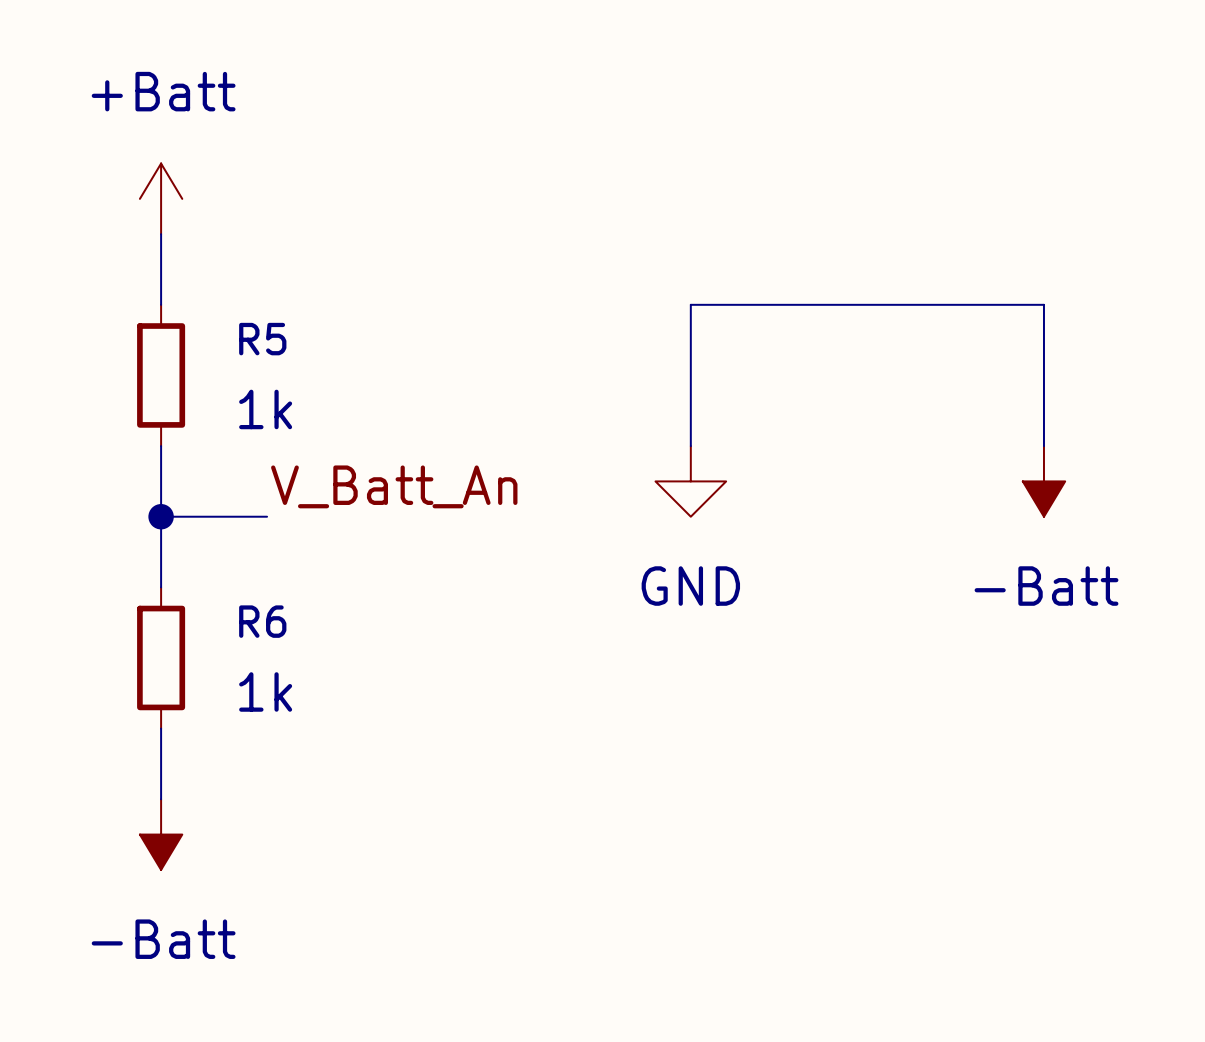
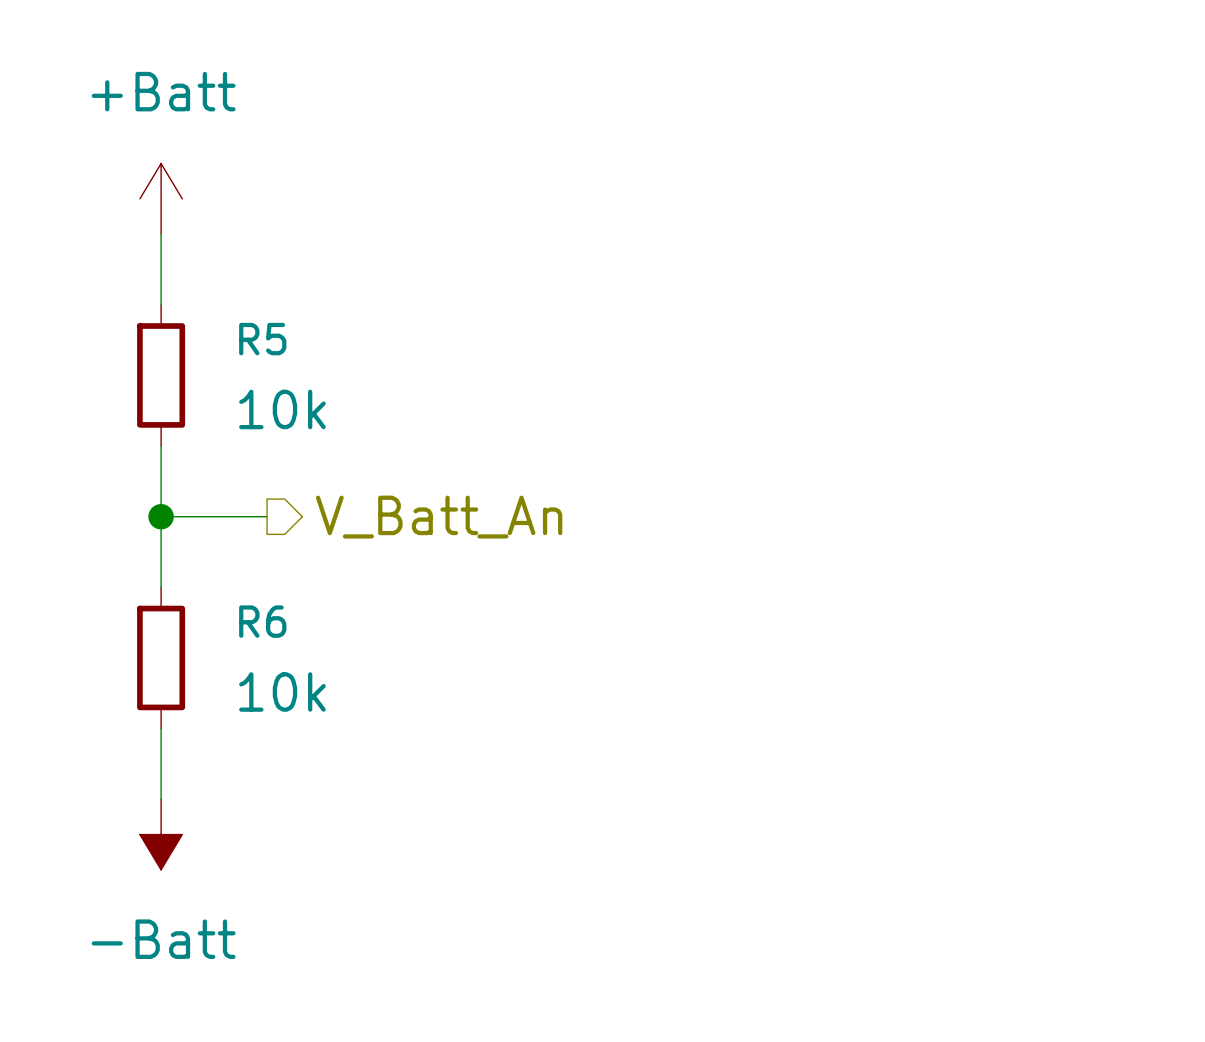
R5 value: 1k (265, 409) -> 10k (282, 409)
wire: (690, 446) (690, 304) (1043, 304) (1043, 446) -> none
power symbol: GND (690, 481) -> none
power symbol: -Batt (1043, 481) -> none
label: V_Batt_An (394, 486) -> none
hierarchical label: none -> V_Batt_An (439, 517)
R6 value: 1k (265, 691) -> 10k (282, 691)

